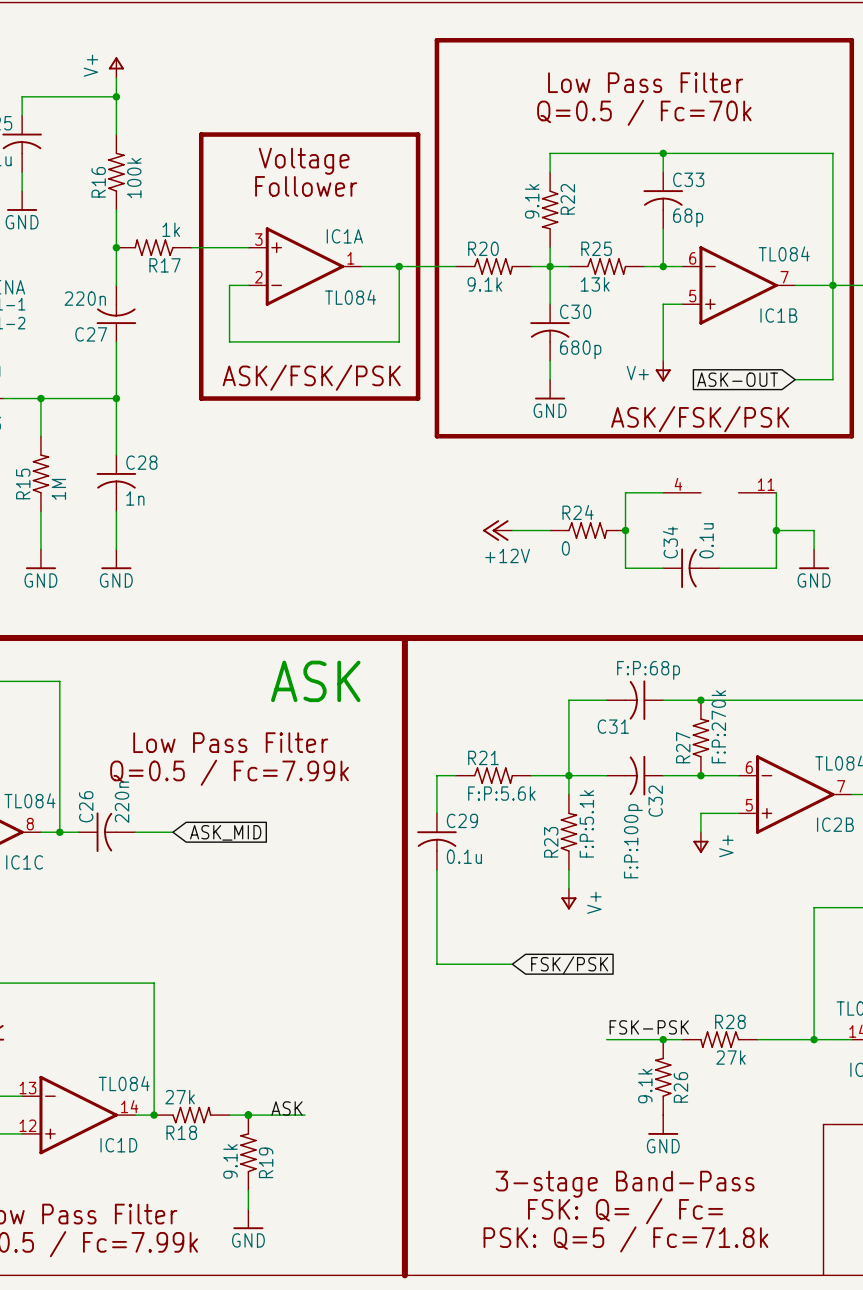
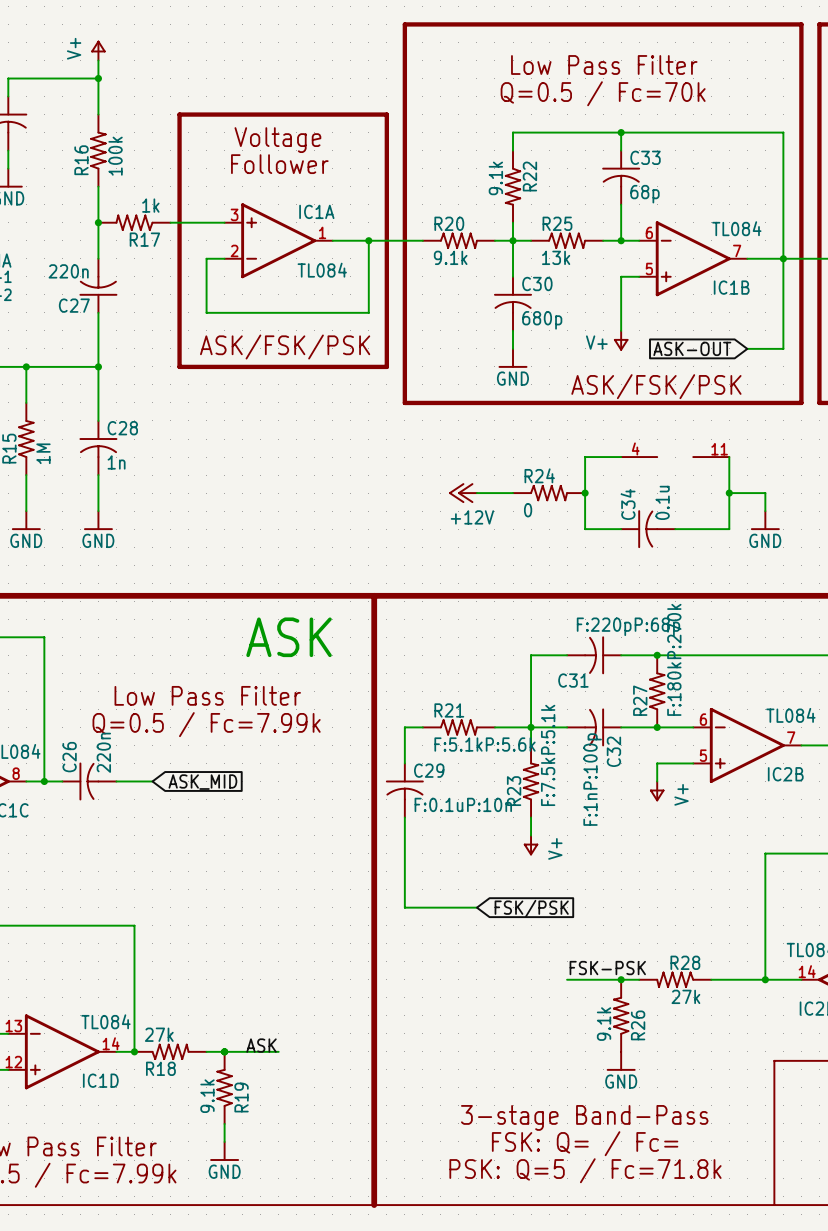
C31 value: F:P:68p (648, 670) -> F:220pP:68p (628, 626)
R27 value: F:P:270k (718, 726) -> F:180kP:270k (674, 659)
R21 value: F:P:5.6k (501, 793) -> F:5.1kP:5.6k (485, 744)
R23 value: F:P:5.1k (586, 823) -> F:7.5kP:5.1k (548, 755)
C32 value: F:P:100p (633, 841) -> F:1nP:100p (592, 779)
C29 value: 0.1u (464, 856) -> F:0.1uP:10n (463, 804)

